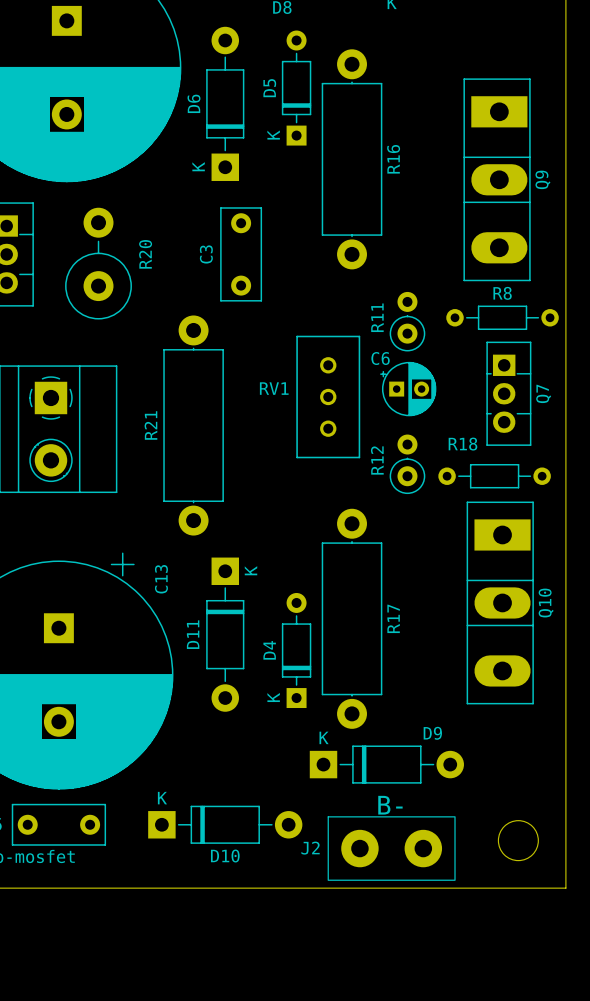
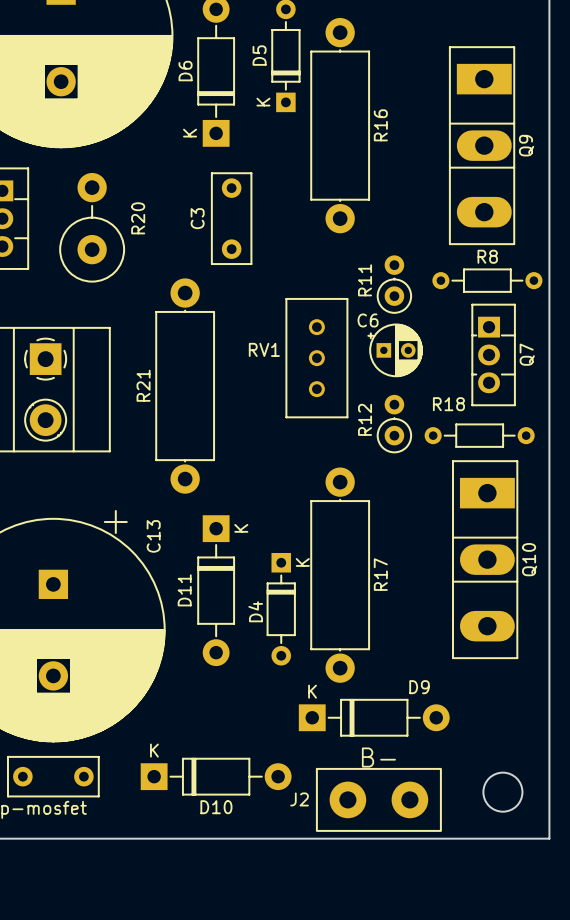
D4 rotation: 0° (296, 650) -> 180° (281, 609)

